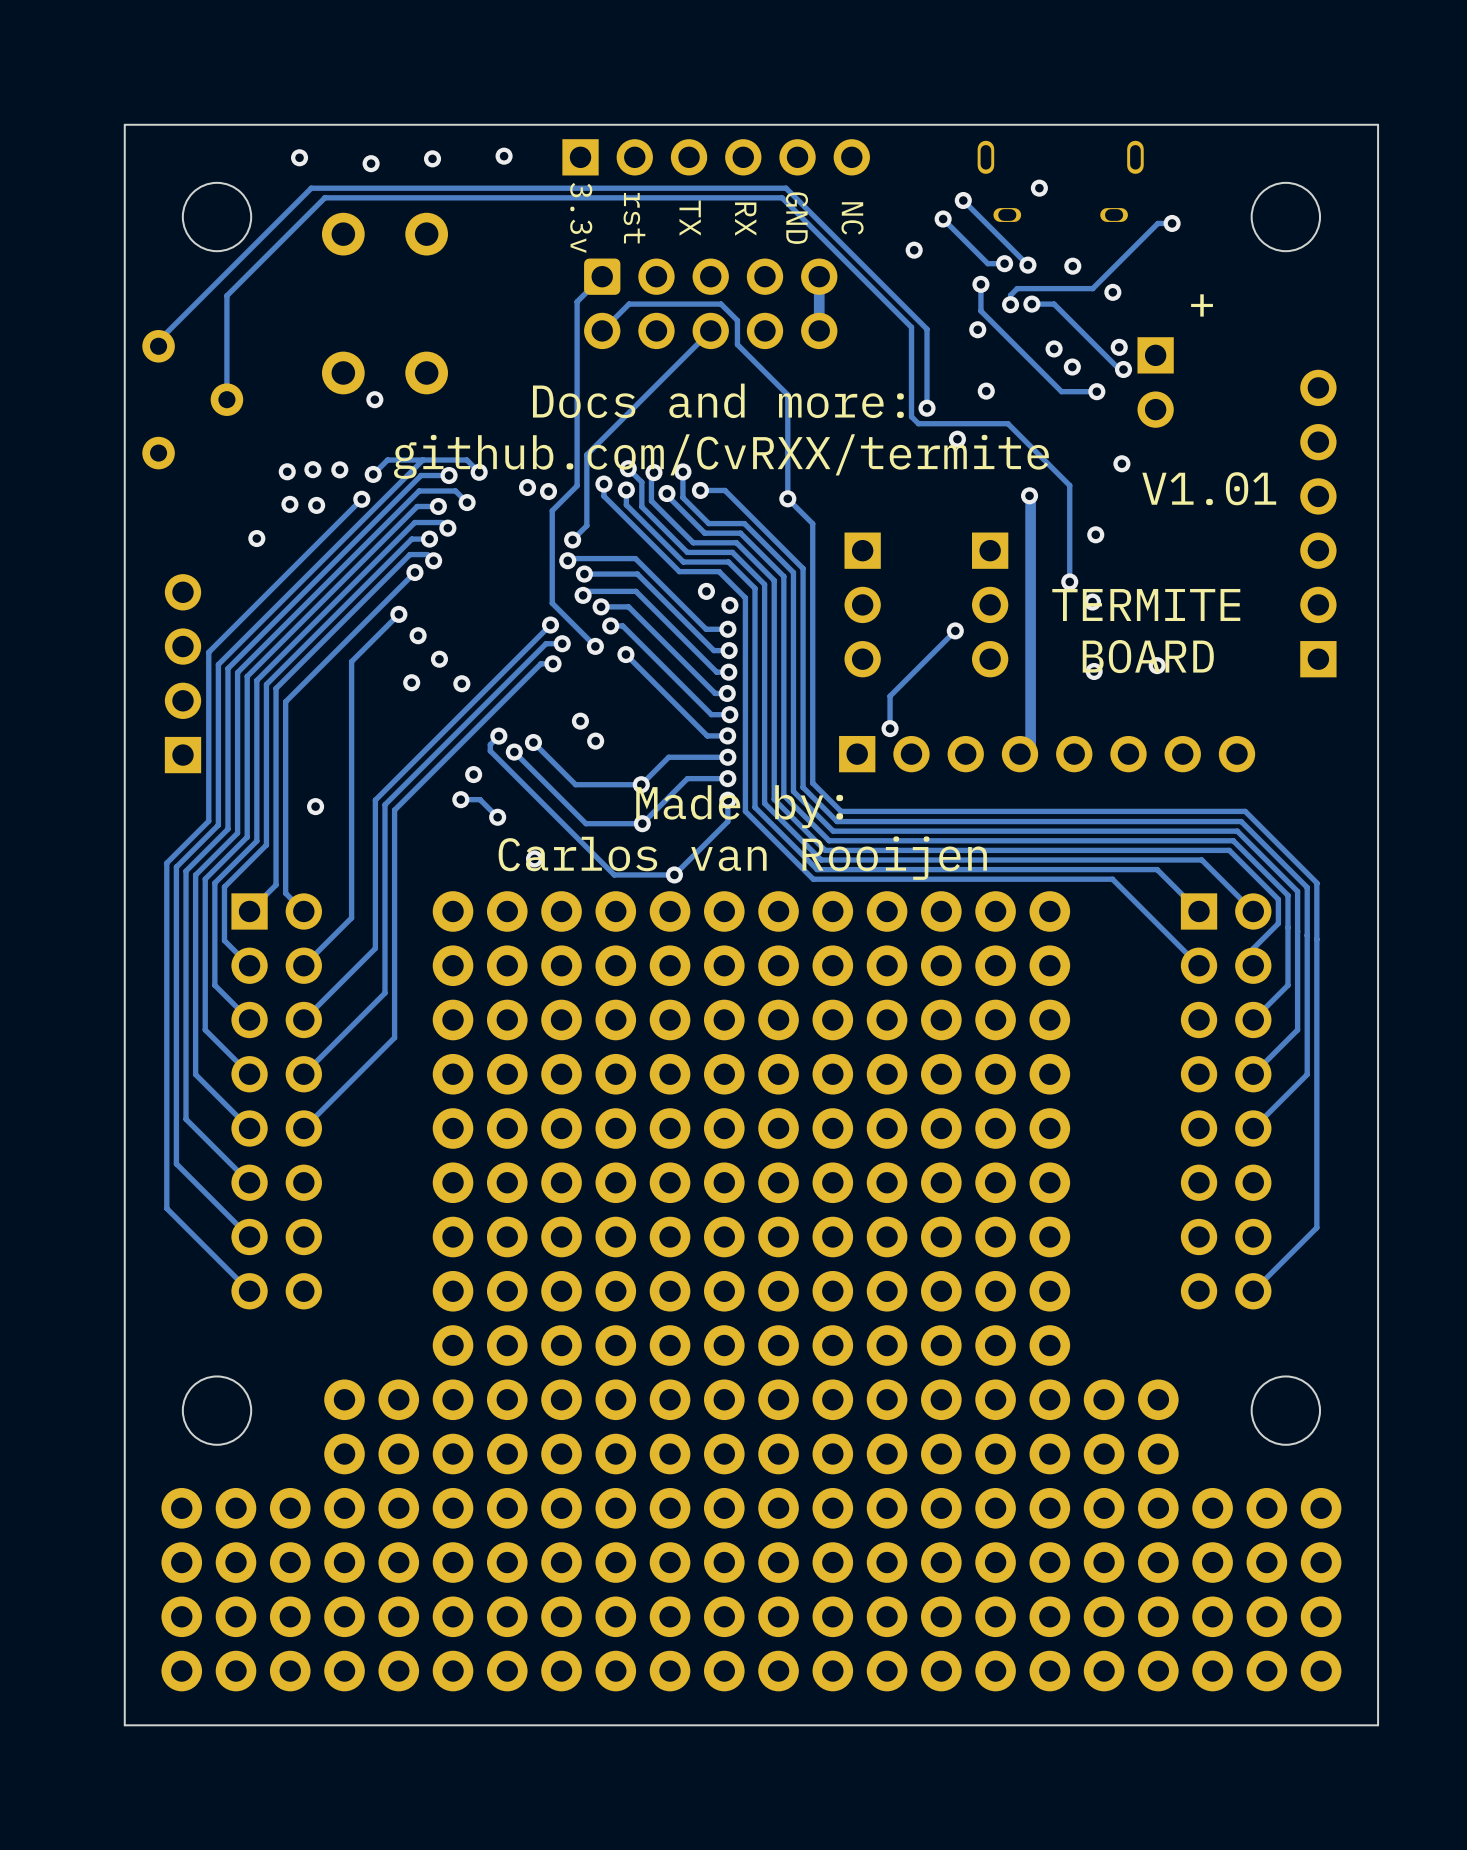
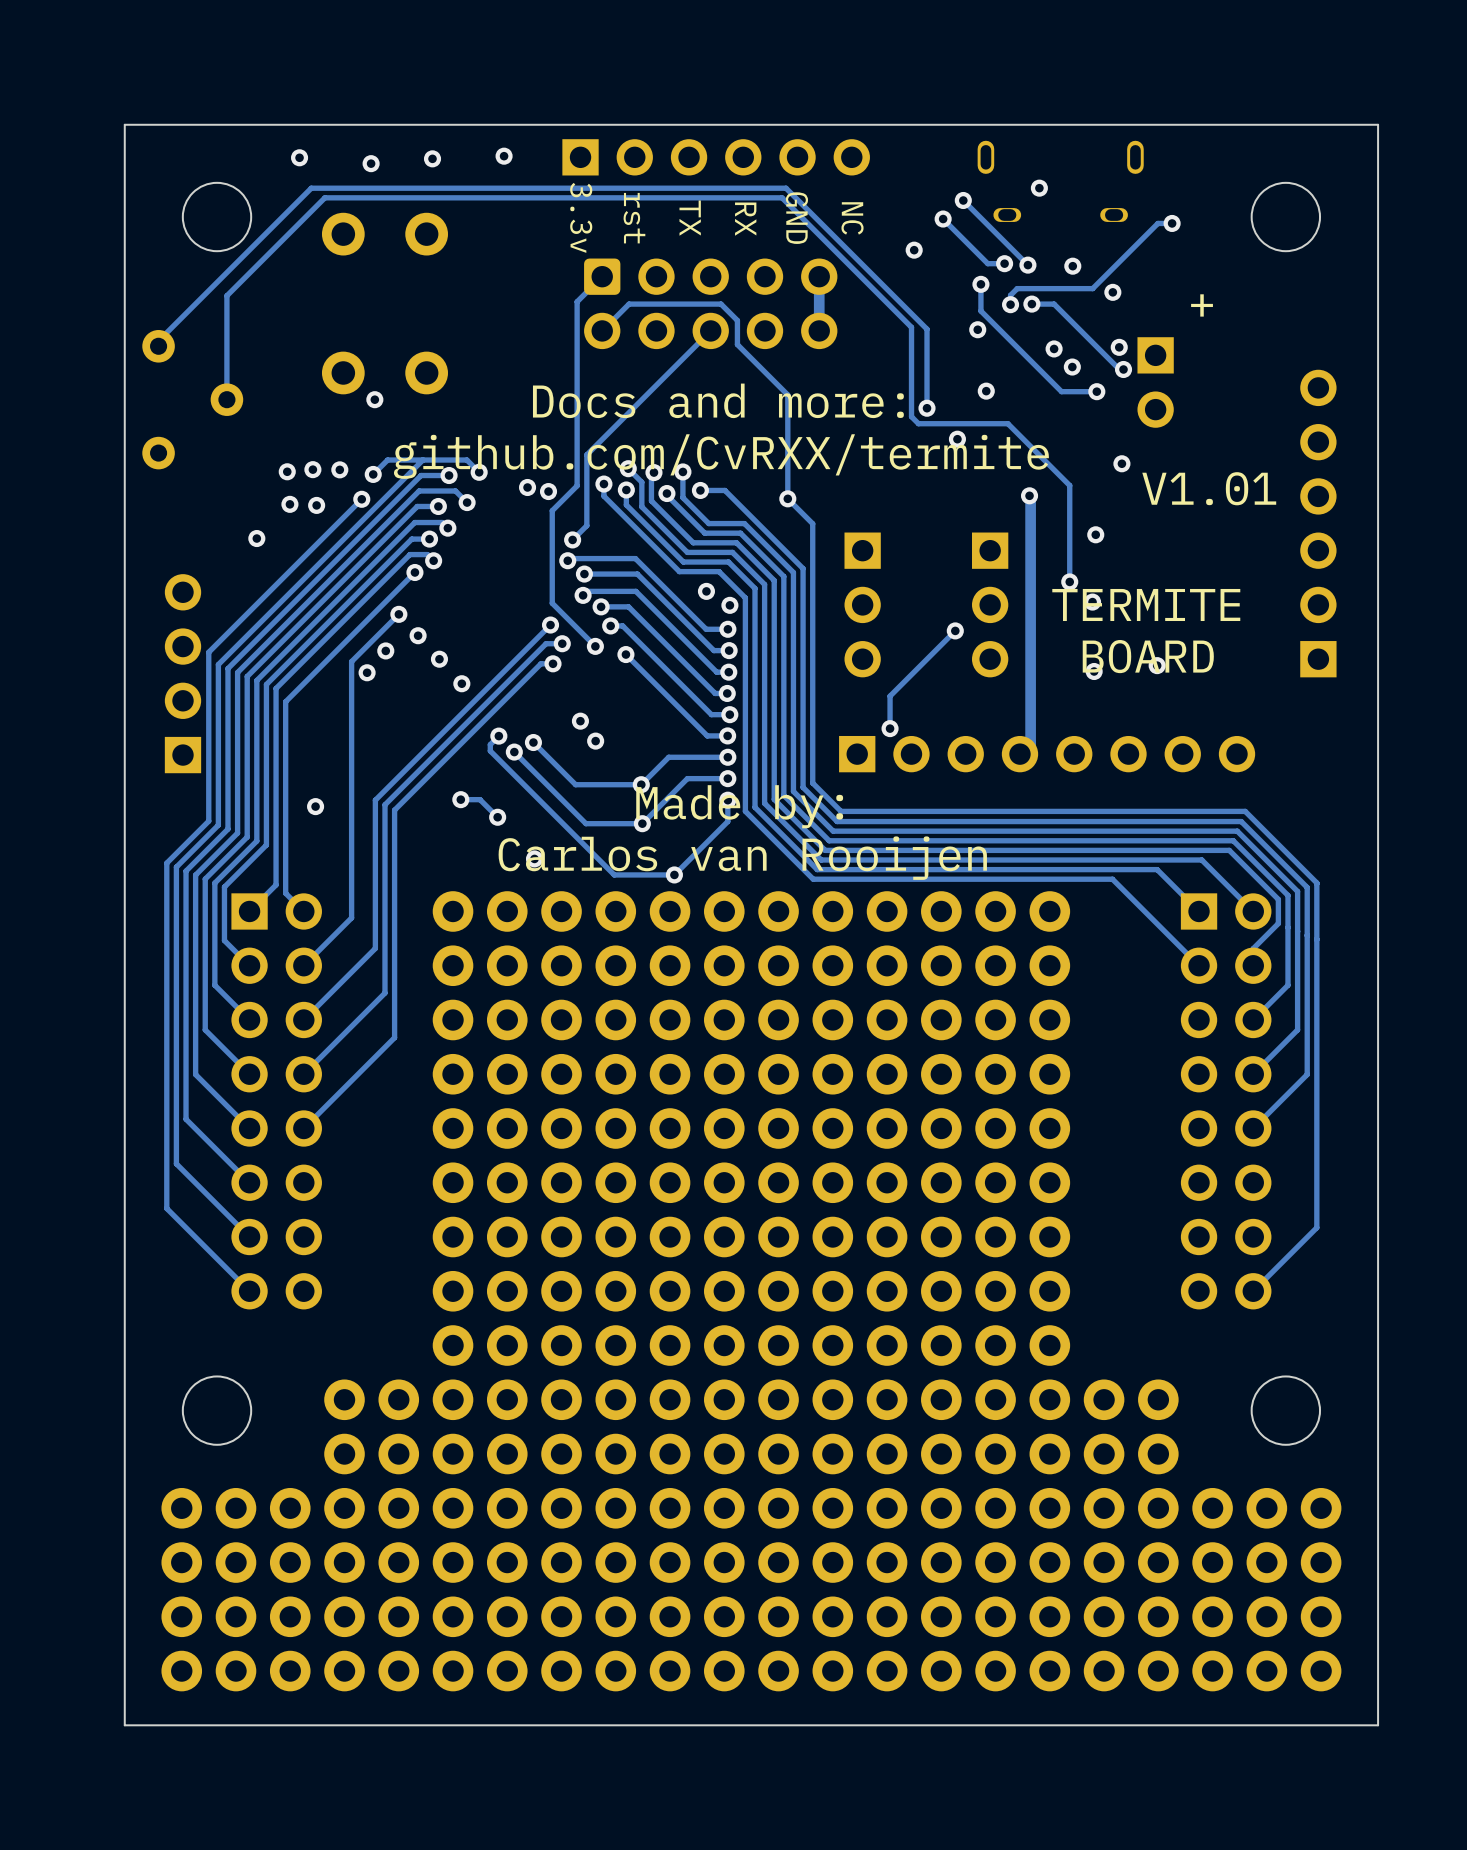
via: none -> (385, 650)
via: none -> (367, 672)
via: (411, 682) -> none
via: (473, 774) -> none

